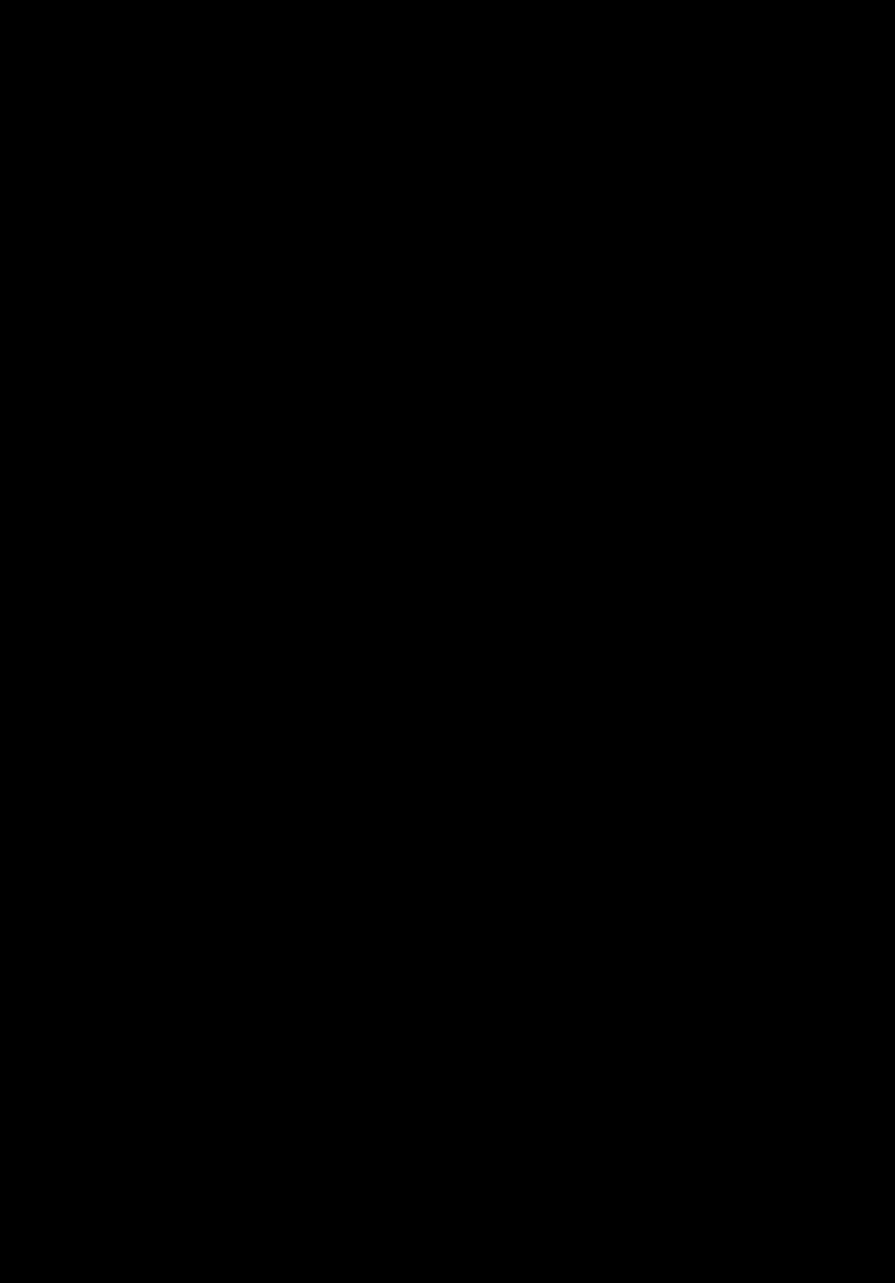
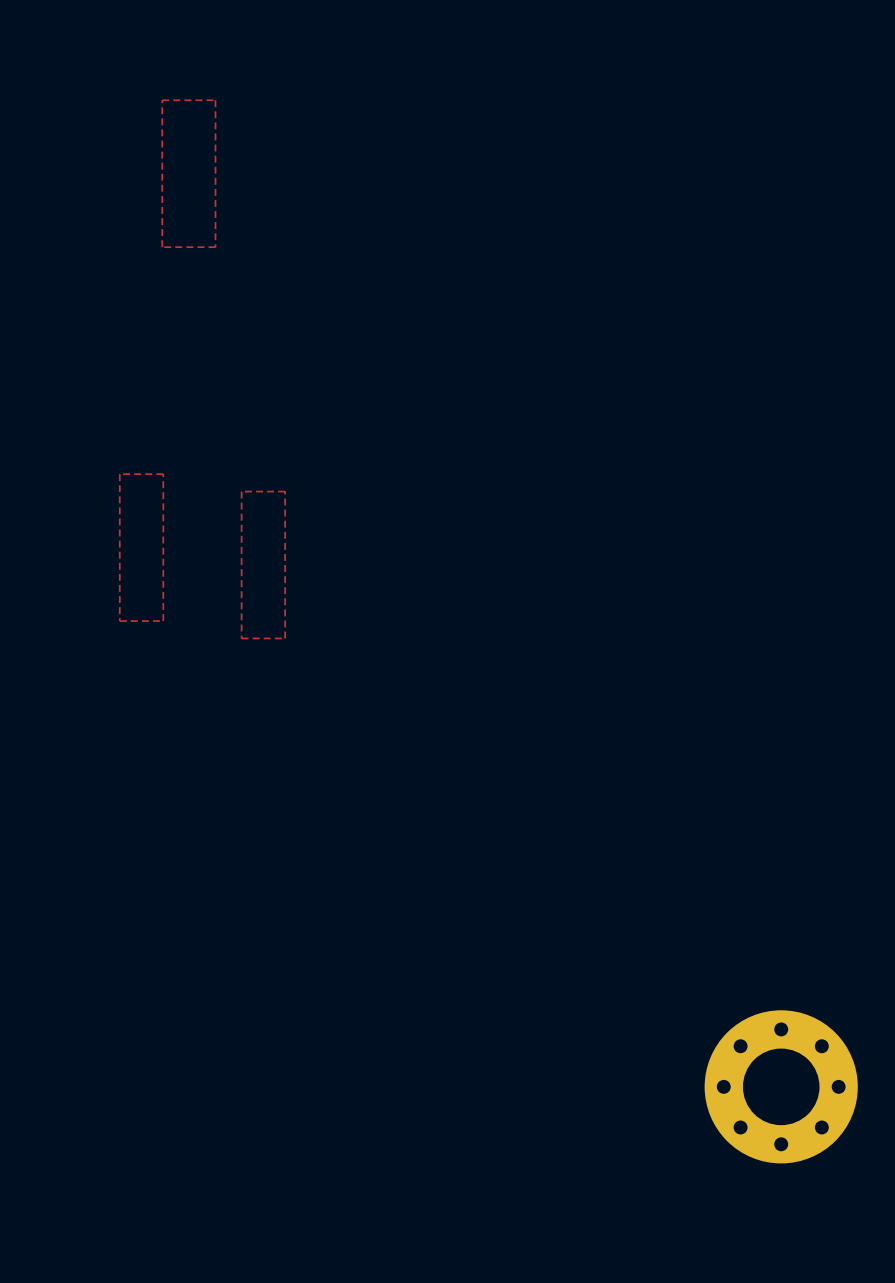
top zone outline: none -> (215, 100) (162, 100) (162, 247) (215, 247) (215, 100)
top zone outline: none -> (163, 474) (119, 474) (119, 621) (163, 621) (163, 474)
top zone outline: none -> (285, 491) (241, 491) (241, 638) (285, 638) (285, 491)
part: none -> (781, 1086)

